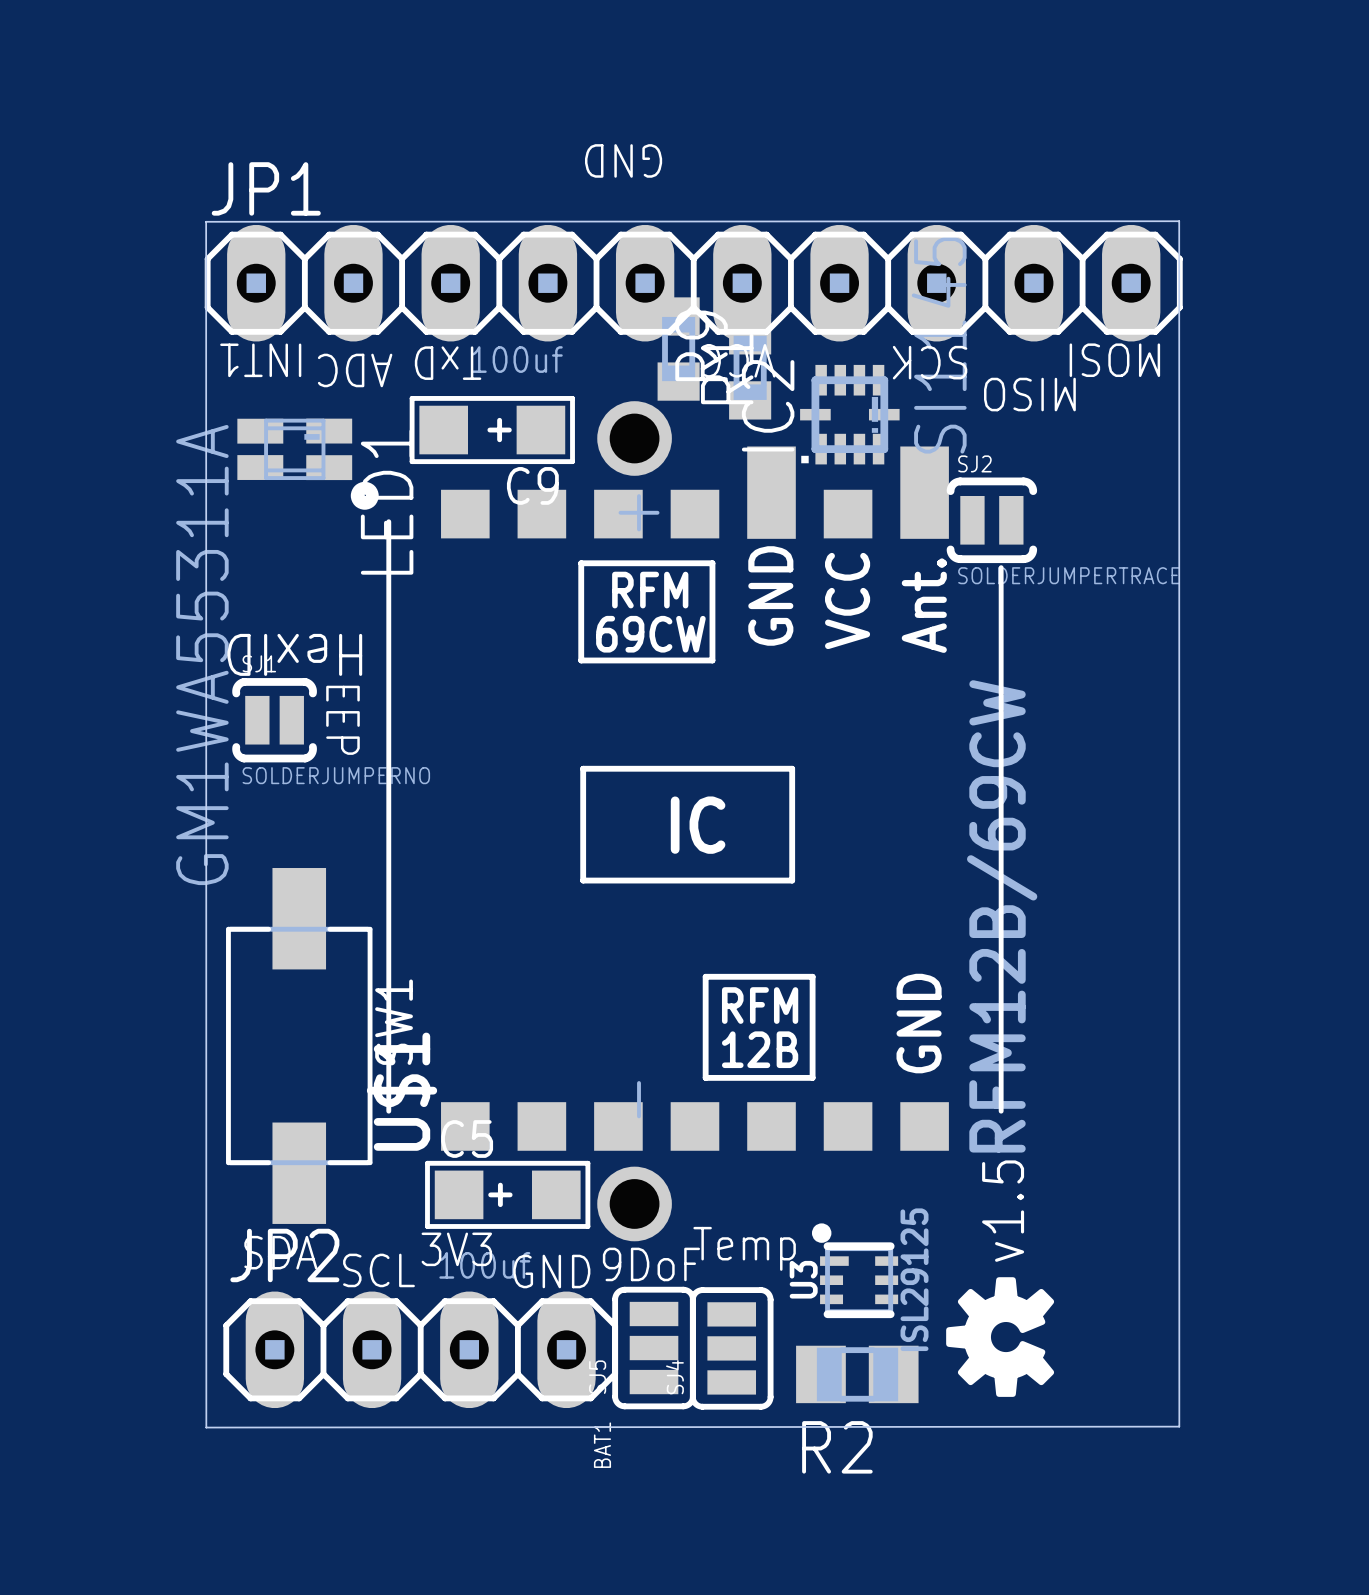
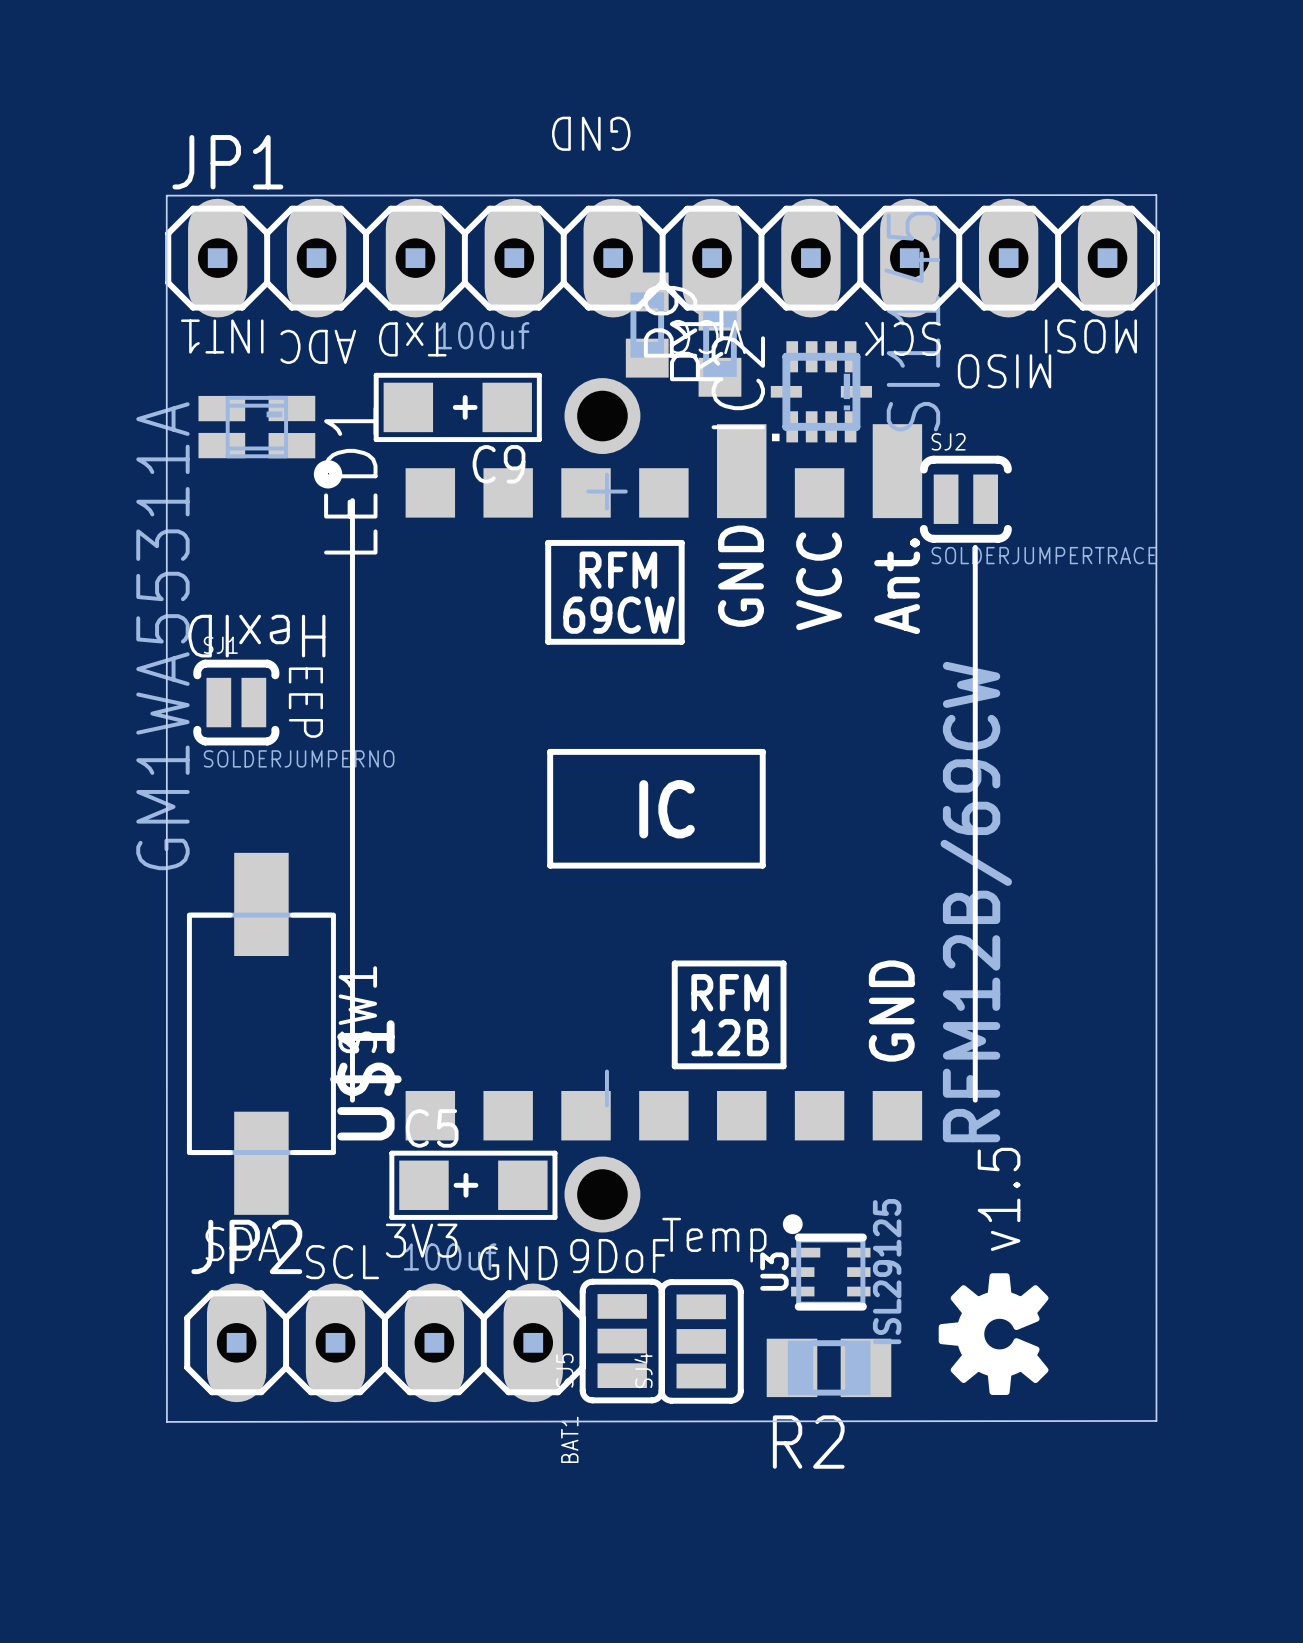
text position: v1.5 (1003, 1211) -> v1.5 (999, 1199)
drawing position: (1000, 1337) -> (993, 1334)

